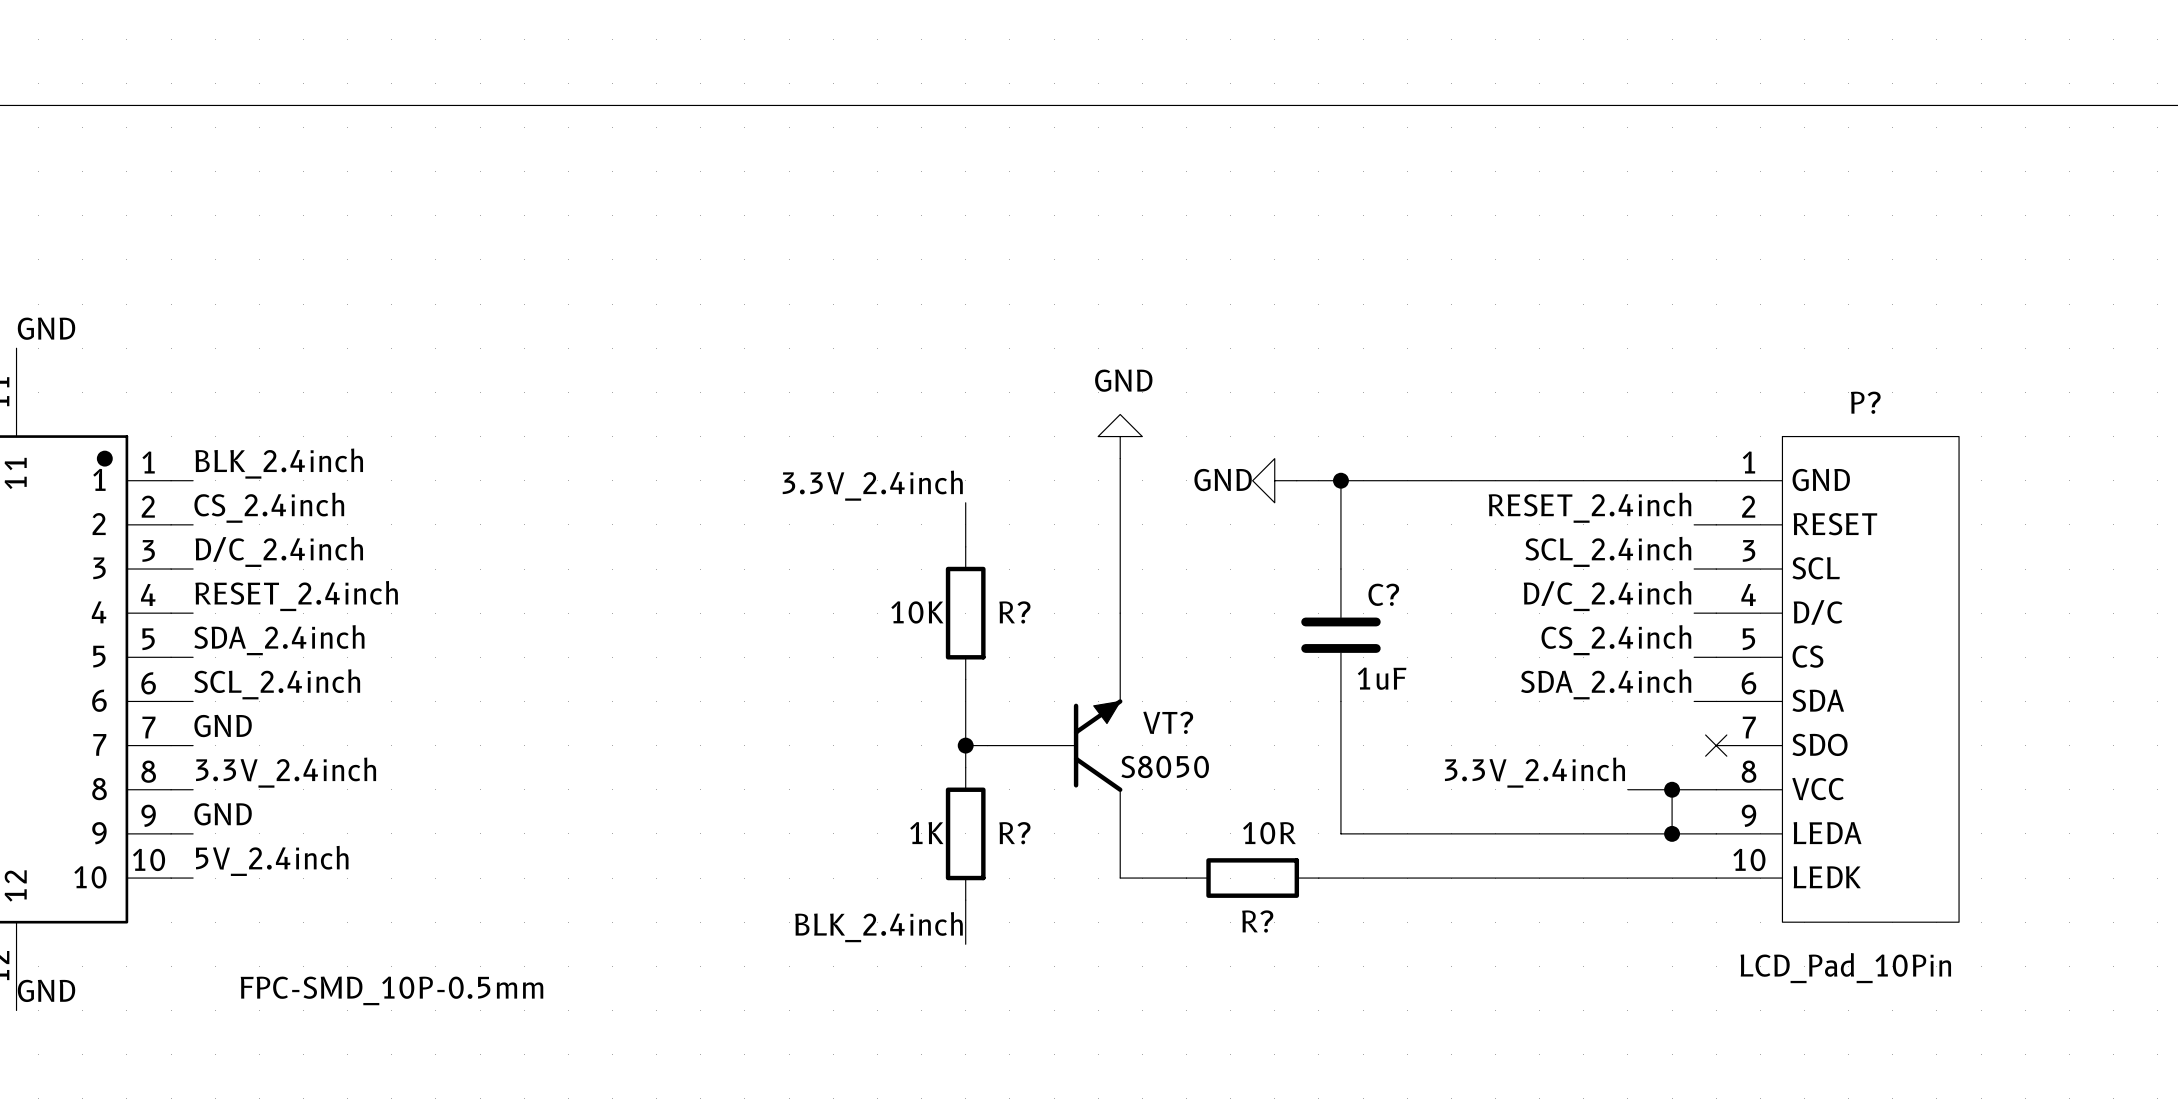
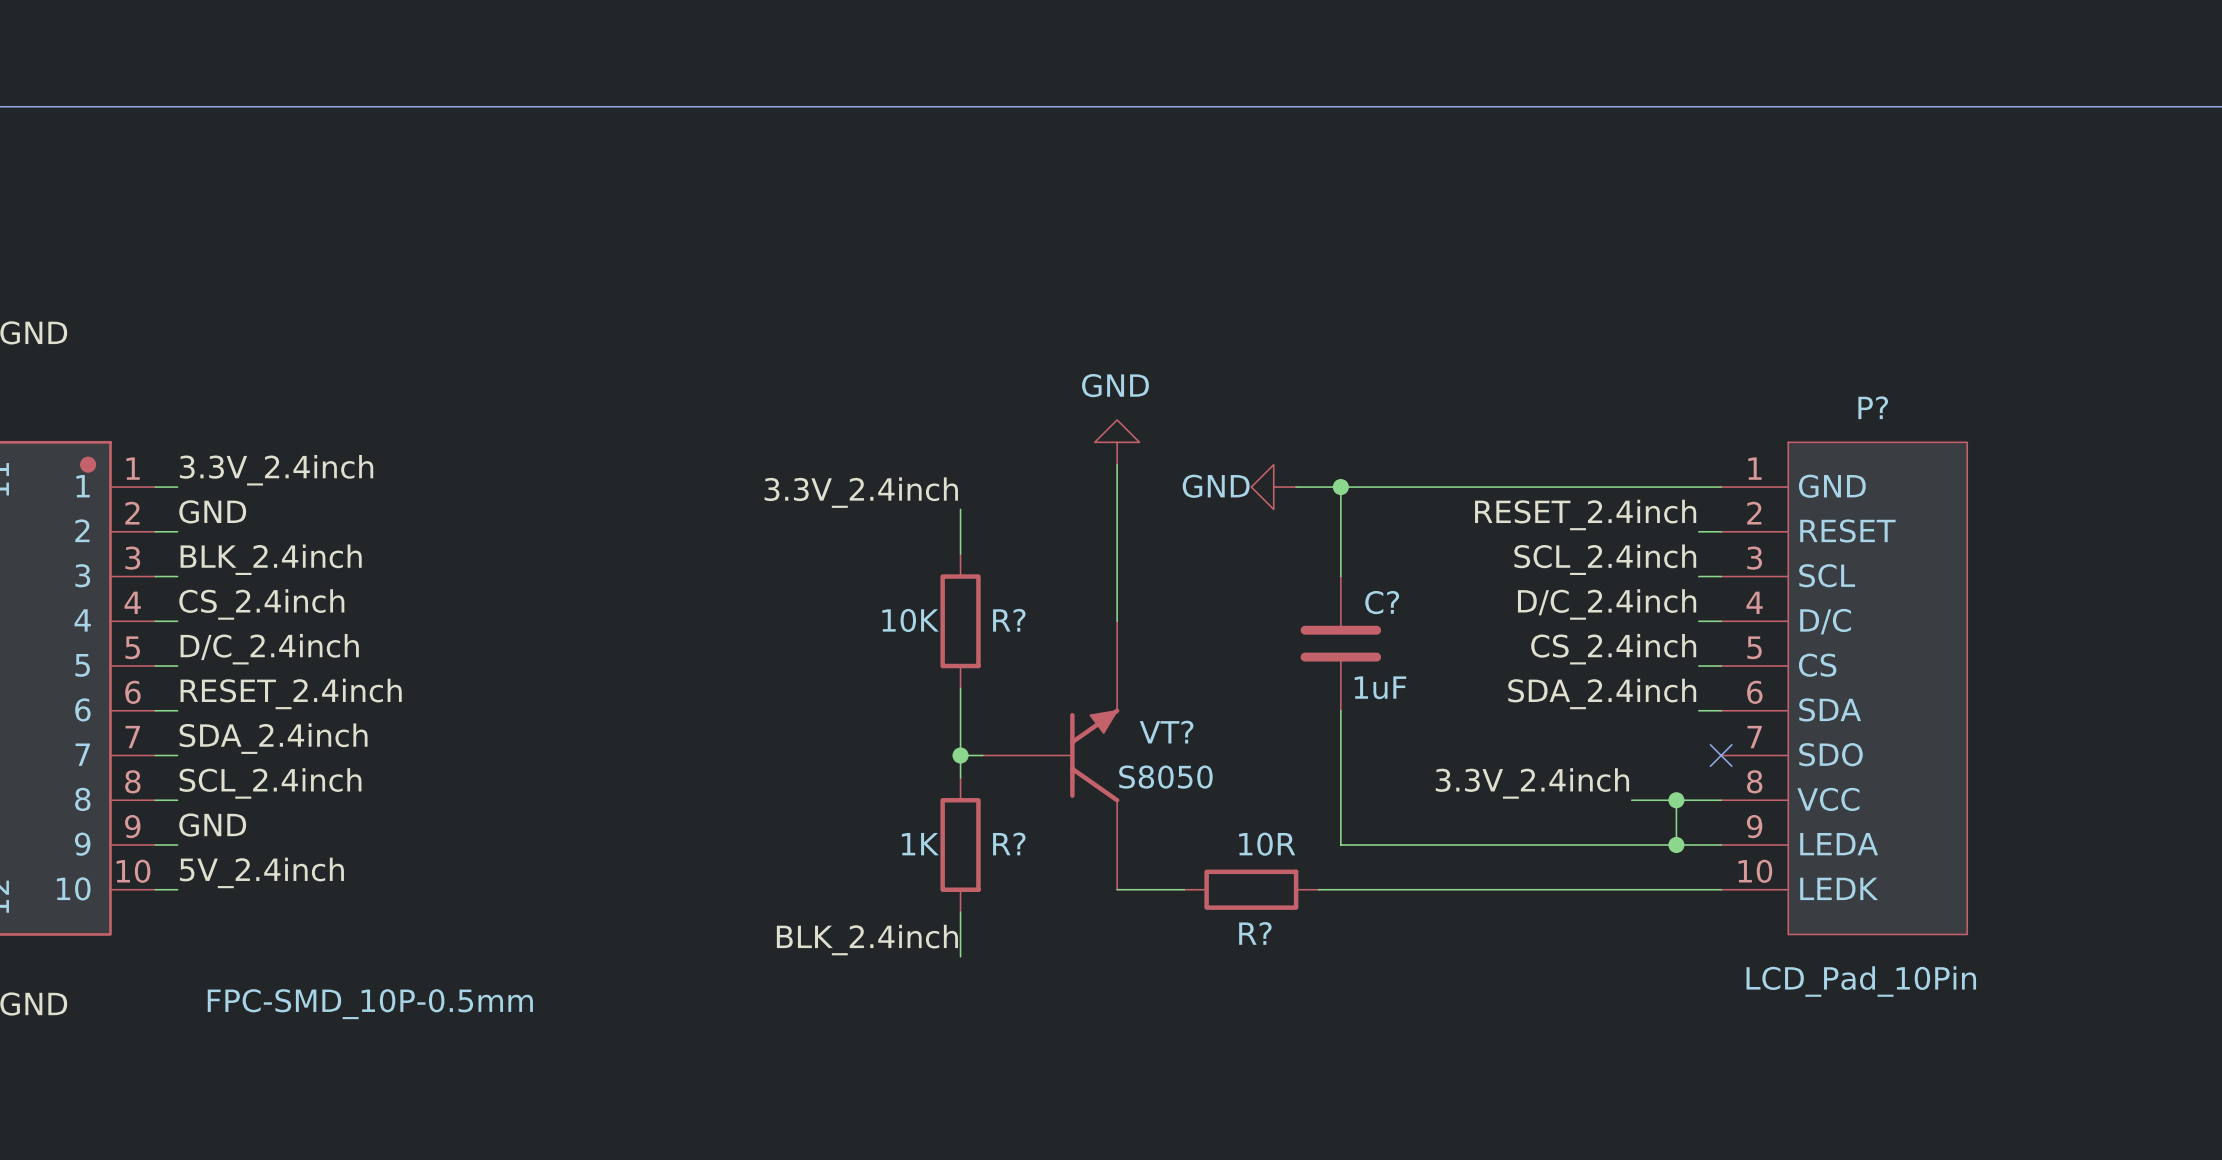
label: BLK_2.4inch (279, 463) -> 3.3V_2.4inch (276, 470)
label: CS_2.4inch (269, 507) -> GND (212, 511)
label: D/C_2.4inch (279, 551) -> BLK_2.4inch (271, 559)
label: RESET_2.4inch (296, 596) -> CS_2.4inch (261, 604)
label: SDA_2.4inch (279, 640) -> D/C_2.4inch (269, 649)
label: SCL_2.4inch (277, 684) -> RESET_2.4inch (291, 693)
label: GND (223, 726) -> SDA_2.4inch (273, 738)
label: 3.3V_2.4inch (286, 772) -> SCL_2.4inch (270, 783)

